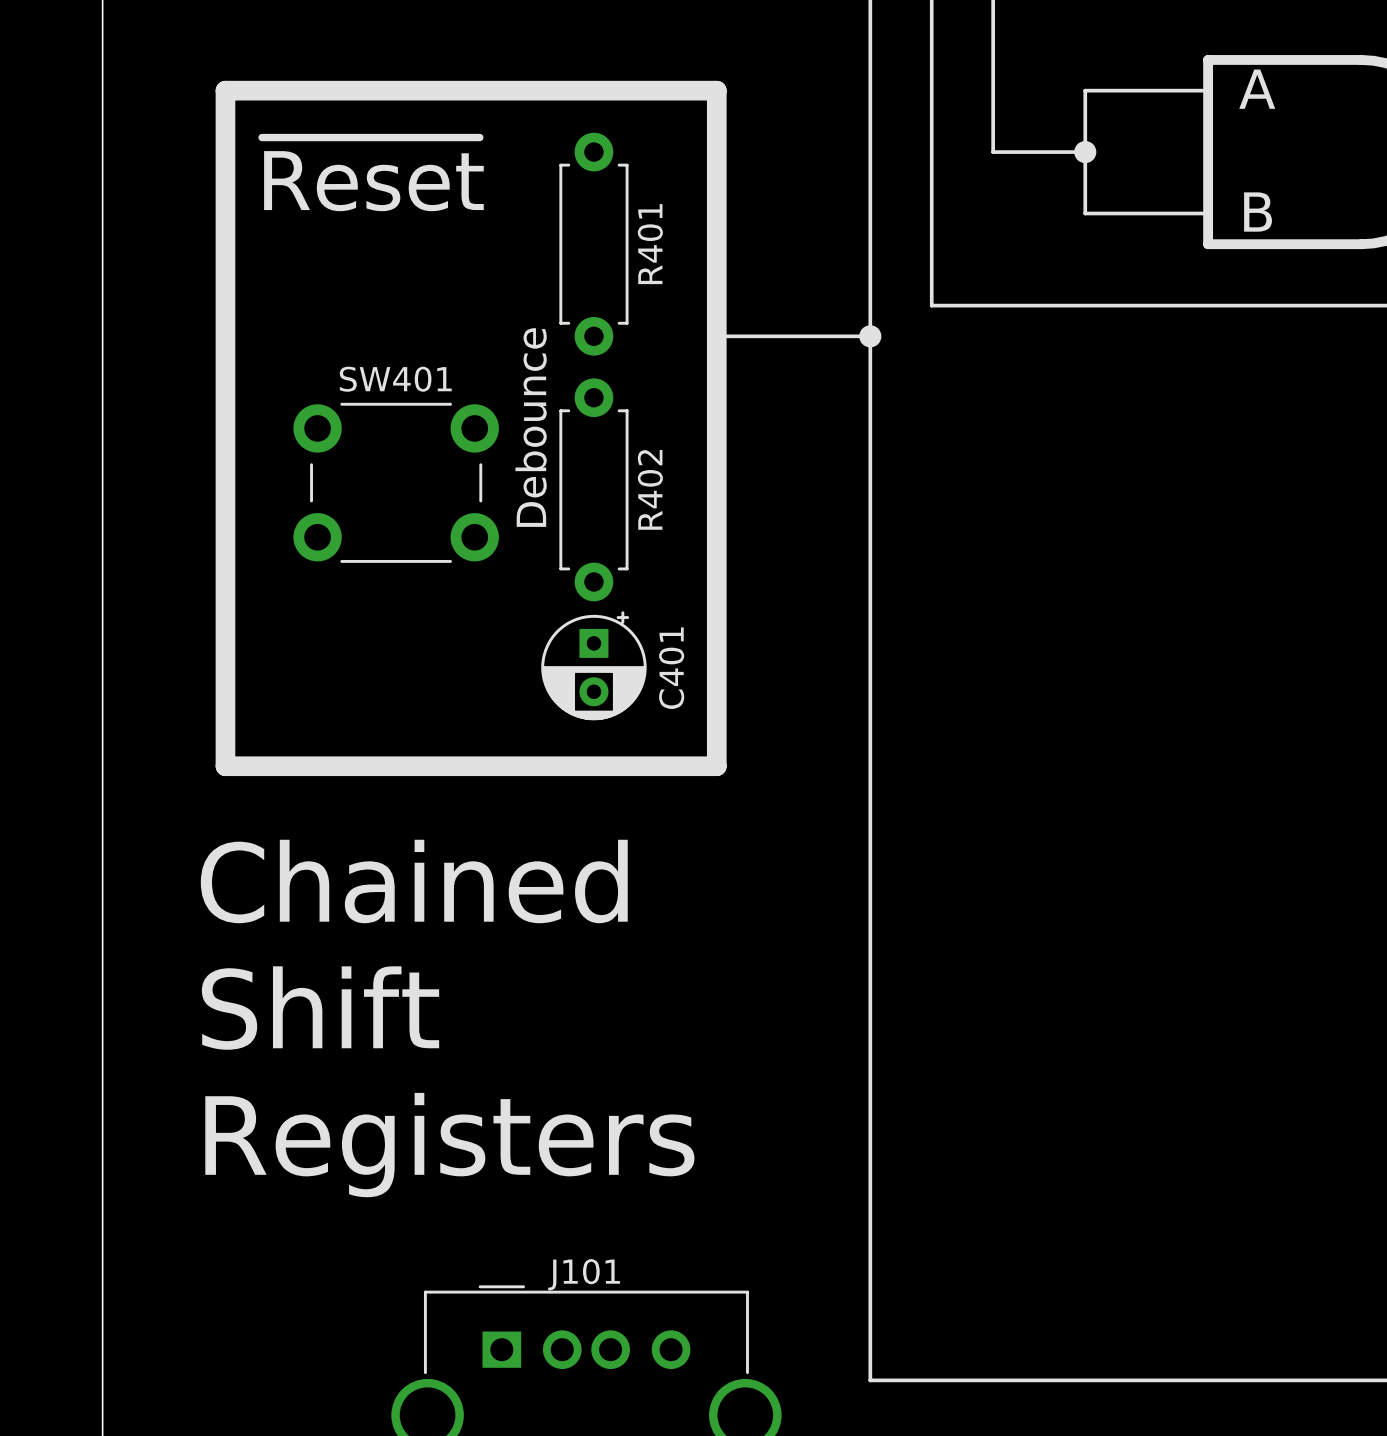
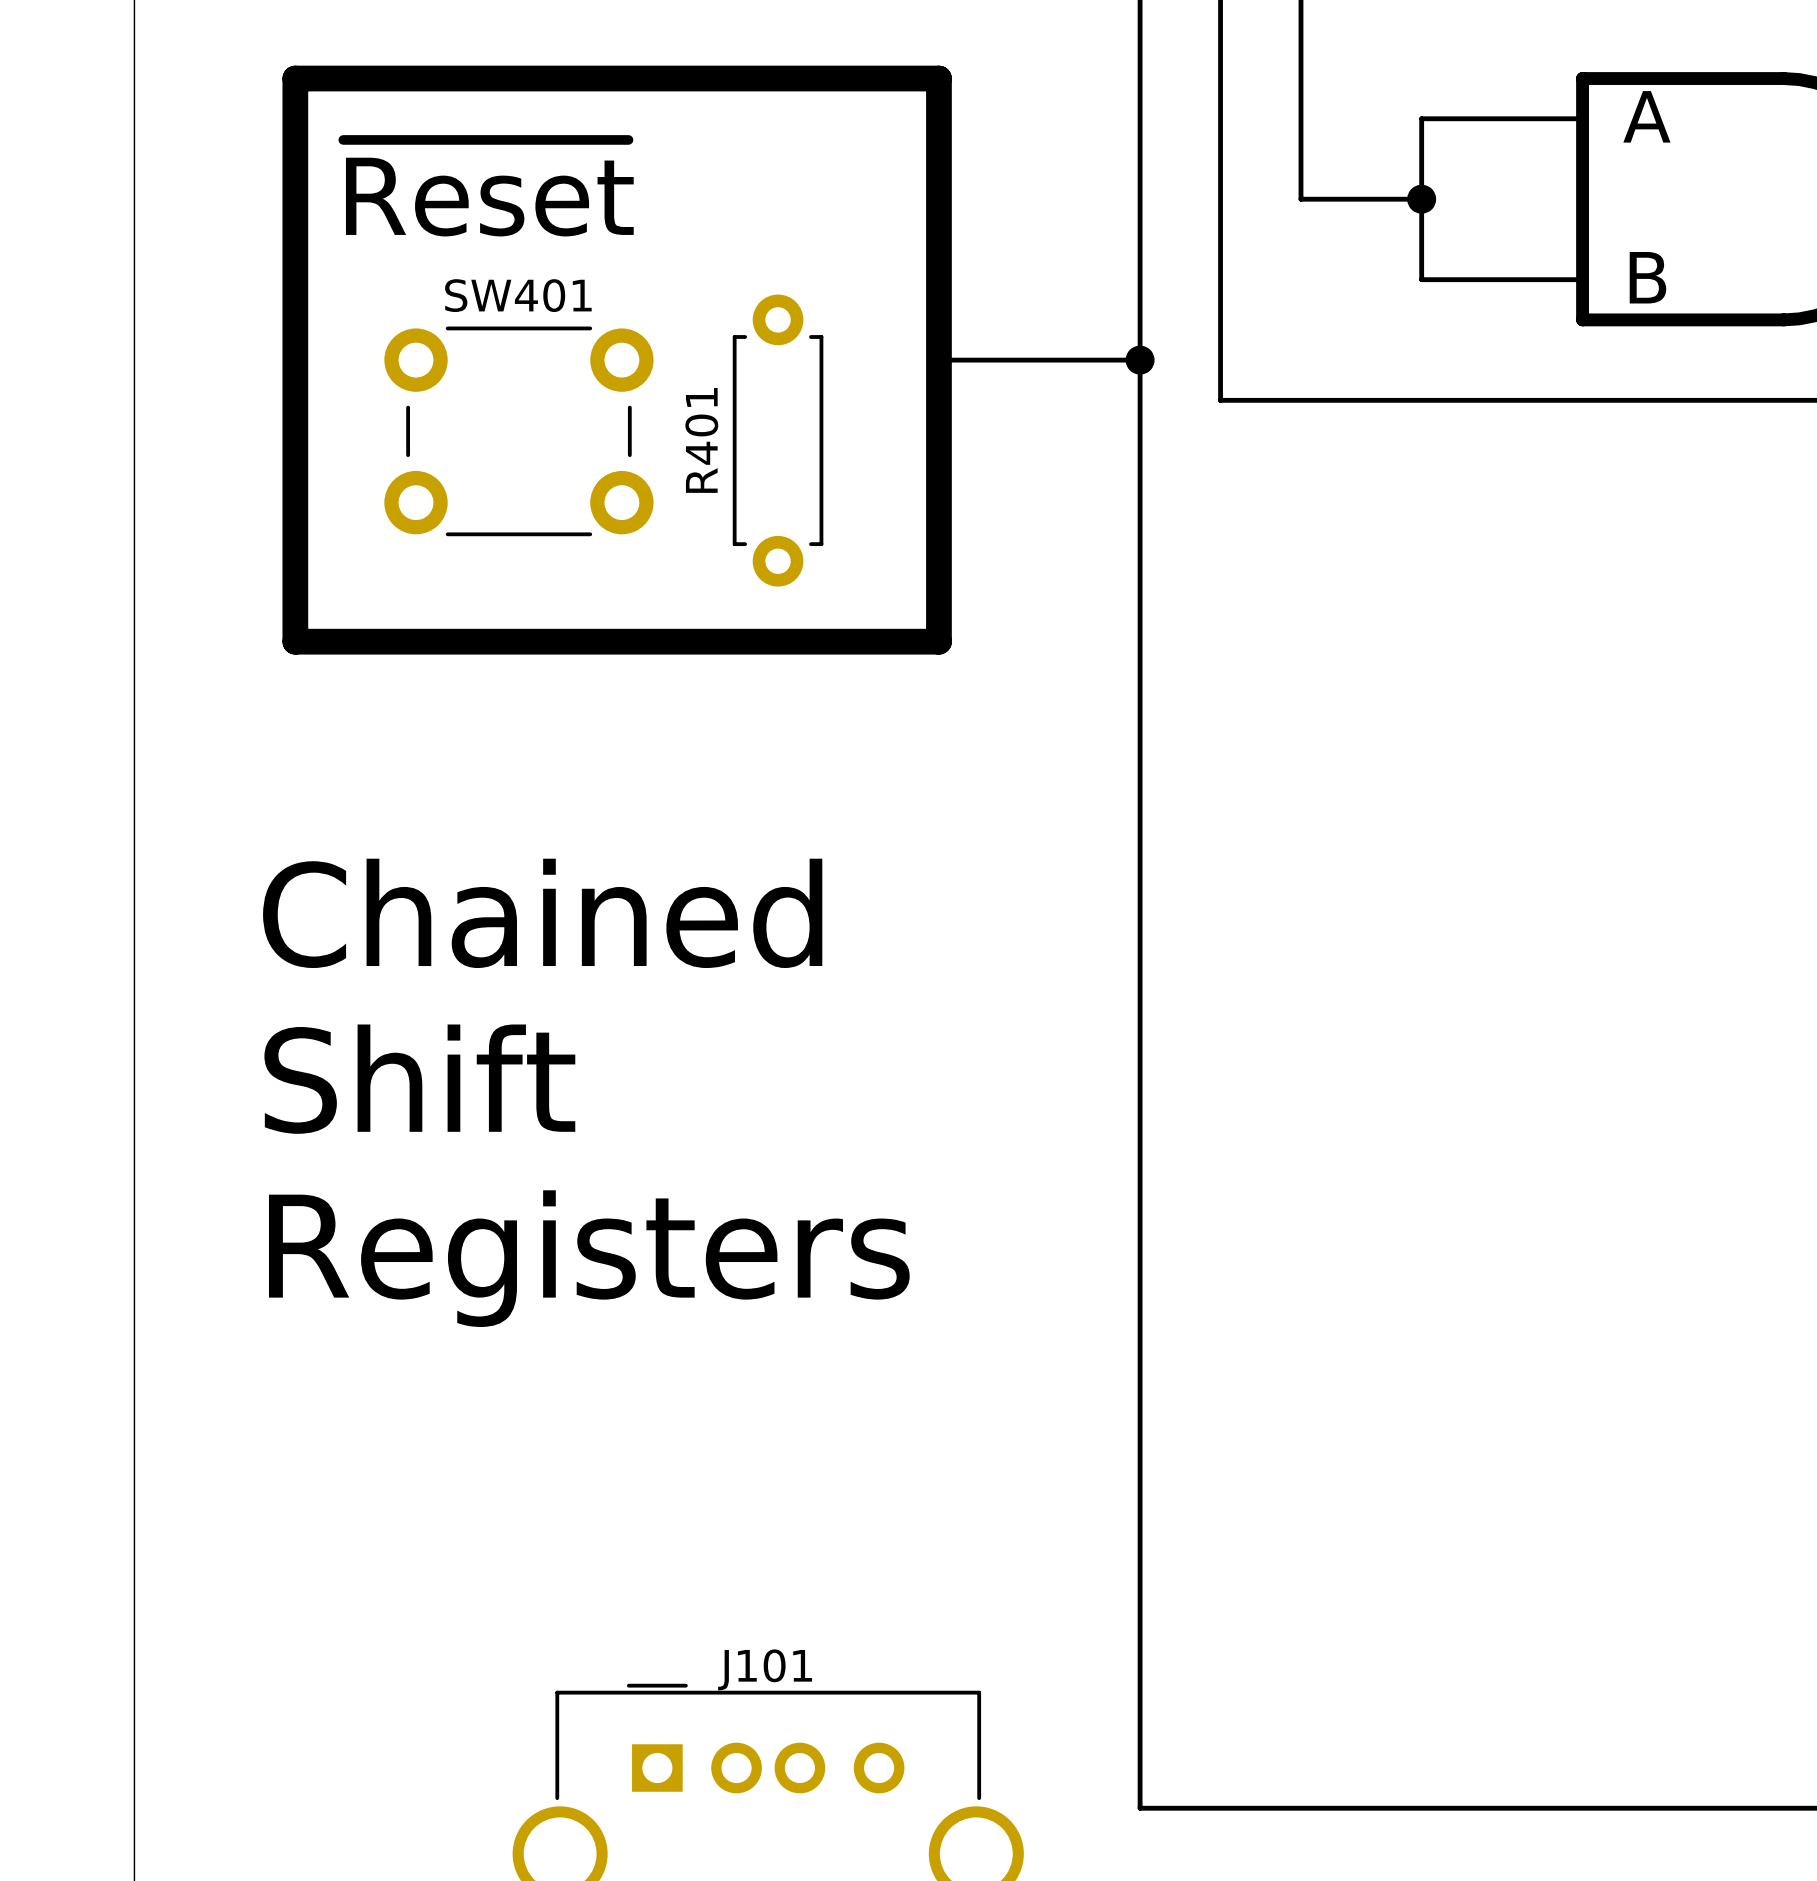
line: (225, 90) (716, 90) -> (295, 118) (295, 78) (938, 78) (938, 118)
text position: ~{Reset} (372, 174) -> ~{Reset} (488, 188)
R401 position: (593, 244) -> (778, 440)
R401 name position: R401 (650, 244) -> R401 (701, 440)
line: none -> (938, 360) (1140, 360)
line: (716, 336) (864, 336) -> none
drawing position: (870, 336) -> (1140, 360)
text: Debounce (531, 427) -> none
SW401 position: (396, 482) -> (518, 431)
line: (225, 489) (225, 766) (716, 766) (716, 489) -> (295, 641) (938, 641)
R402: (593, 489) -> none
C401: (593, 665) -> none
text position: Chained (414, 881) -> Chained (542, 913)
text position: Shift (320, 1008) -> Shift (419, 1079)
text position: Registers (449, 1145) -> Registers (589, 1258)

